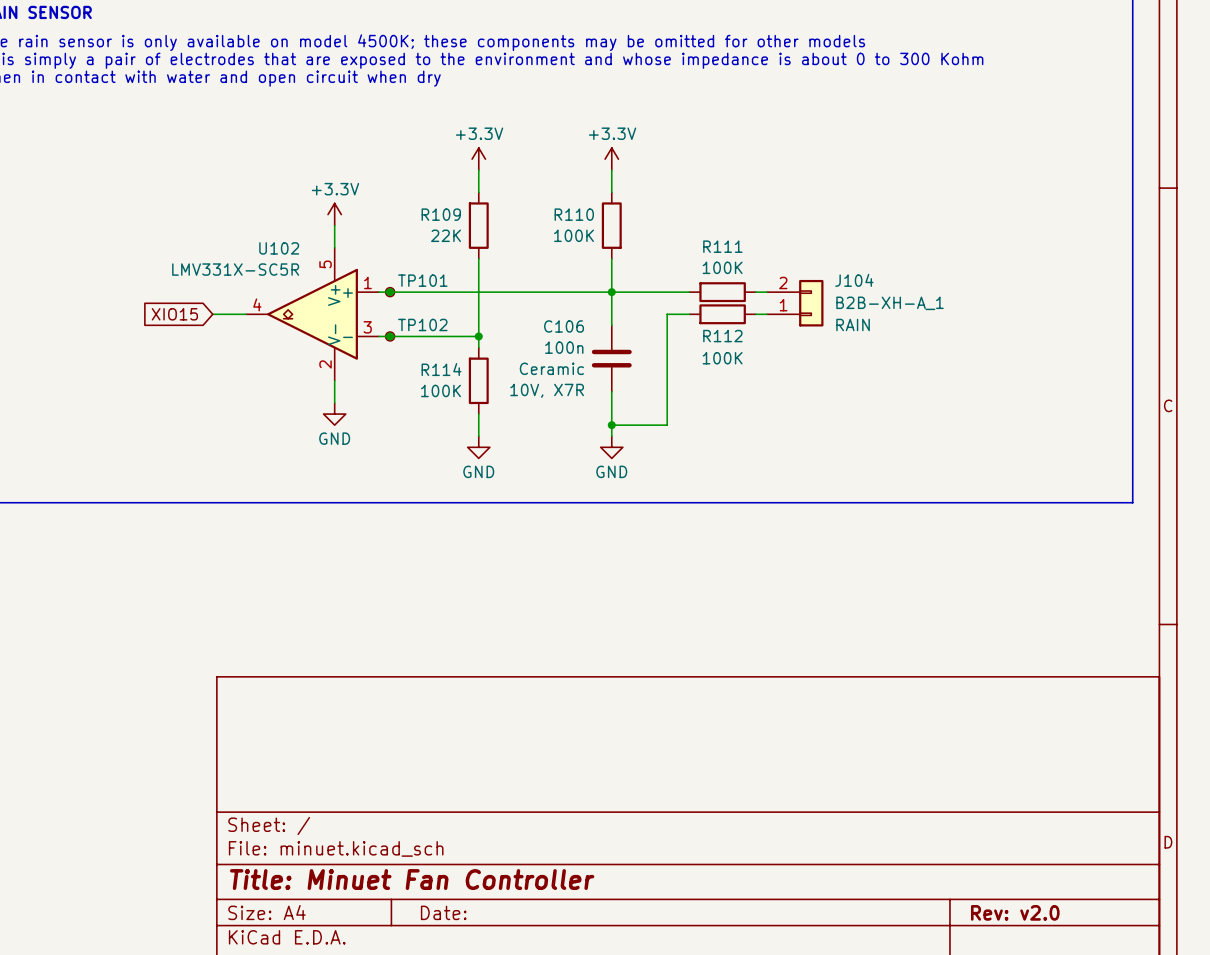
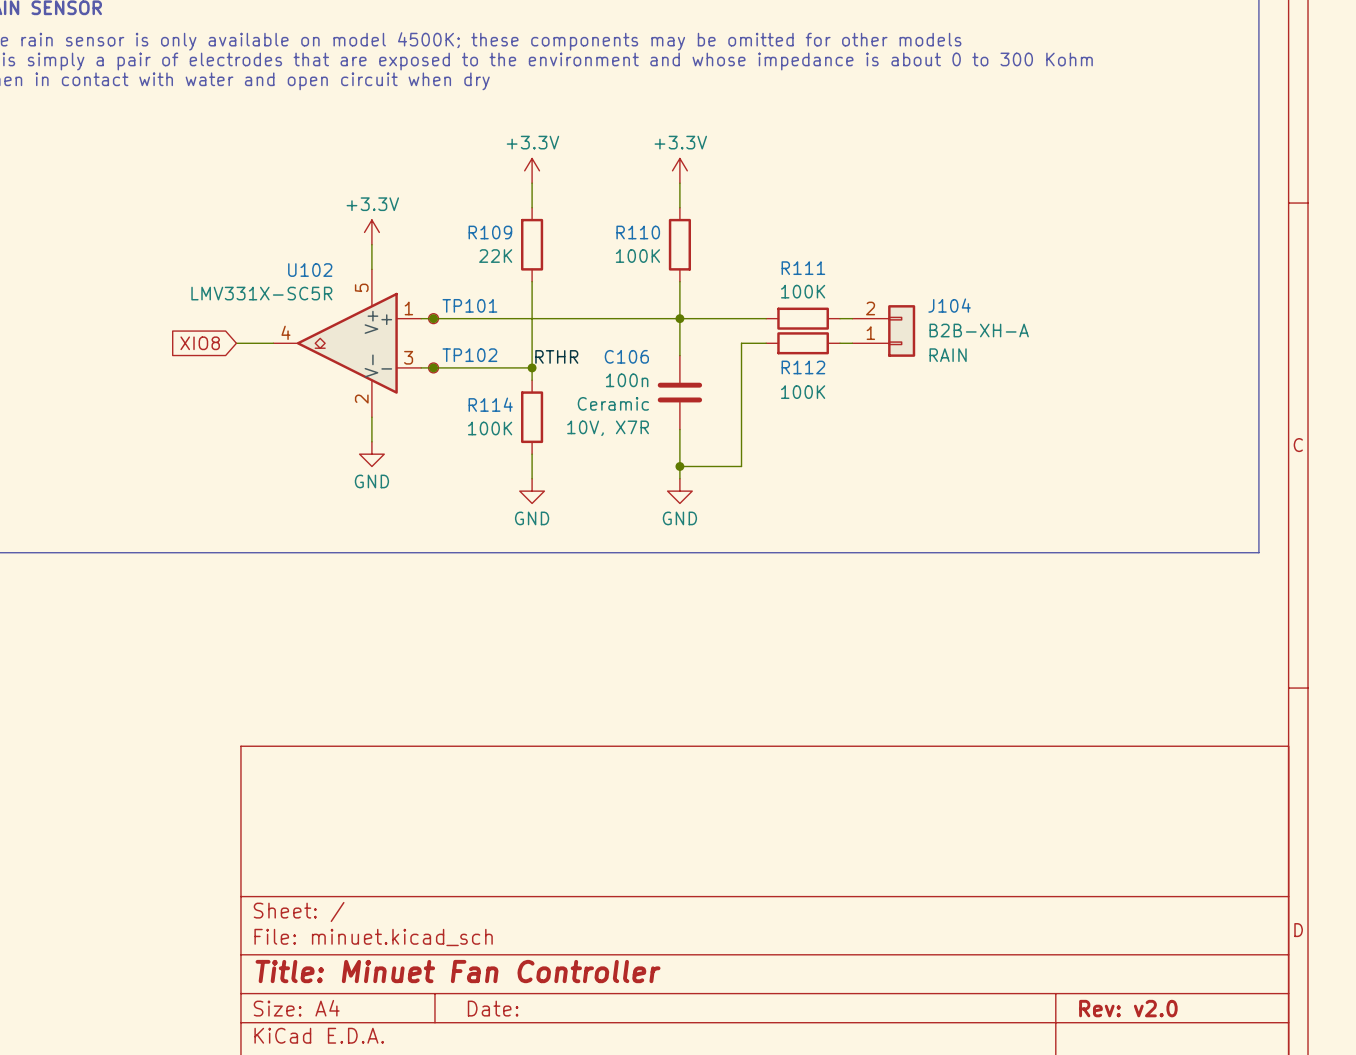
J104 value: B2B-XH-A_1 (890, 303) -> B2B-XH-A (979, 330)
global label: XIO15 (174, 314) -> XIO8 (200, 343)
label: none -> RTHR (556, 356)

